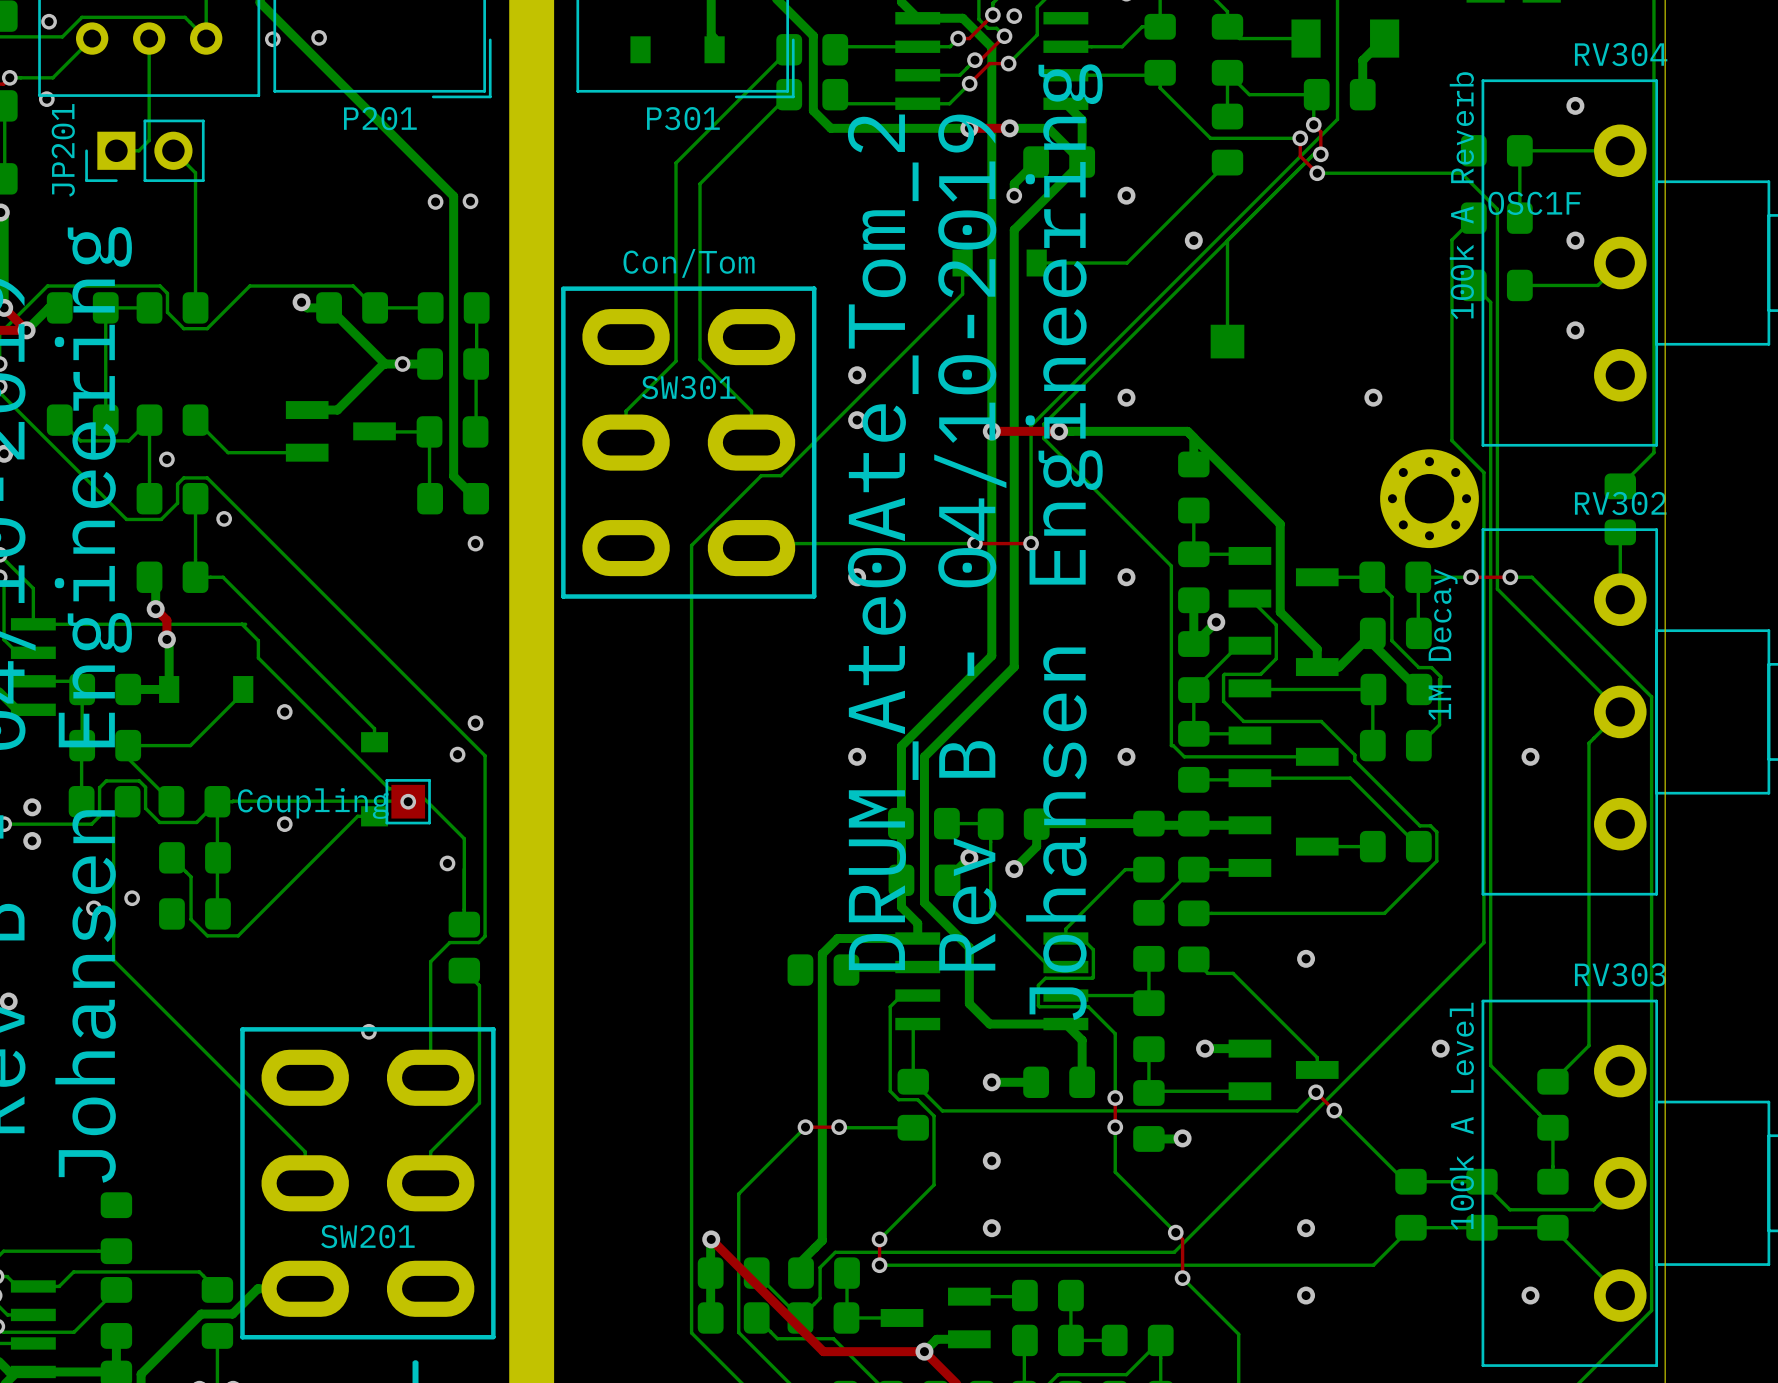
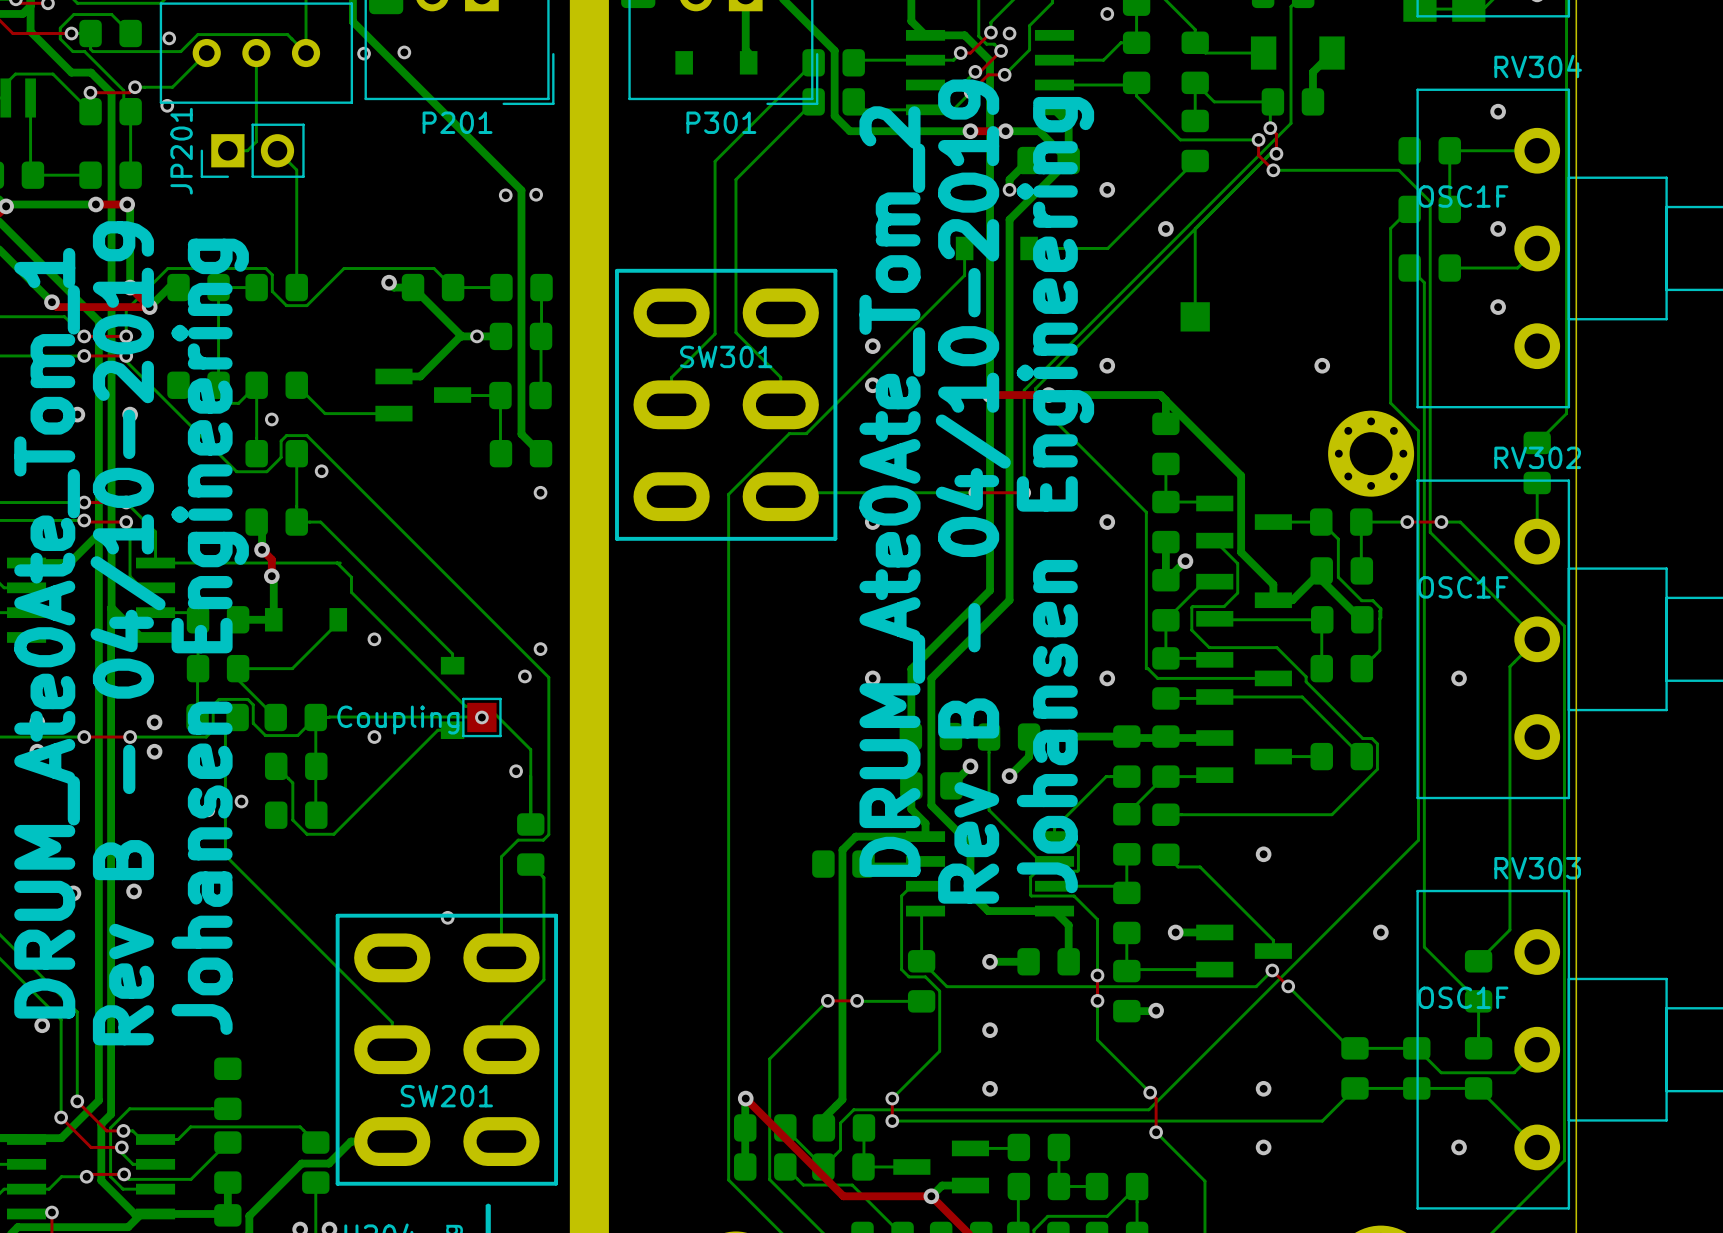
RV304 value: 100k A Reverb (1461, 195) -> none
SW301 value: Con/Tom (689, 263) -> none
RV302 value: 1M Decay (1443, 644) -> none
RV302 text: none -> OSC1F (1463, 587)
RV303 value: 100k A Level (1461, 1116) -> none
RV303 text: none -> OSC1F (1463, 997)

